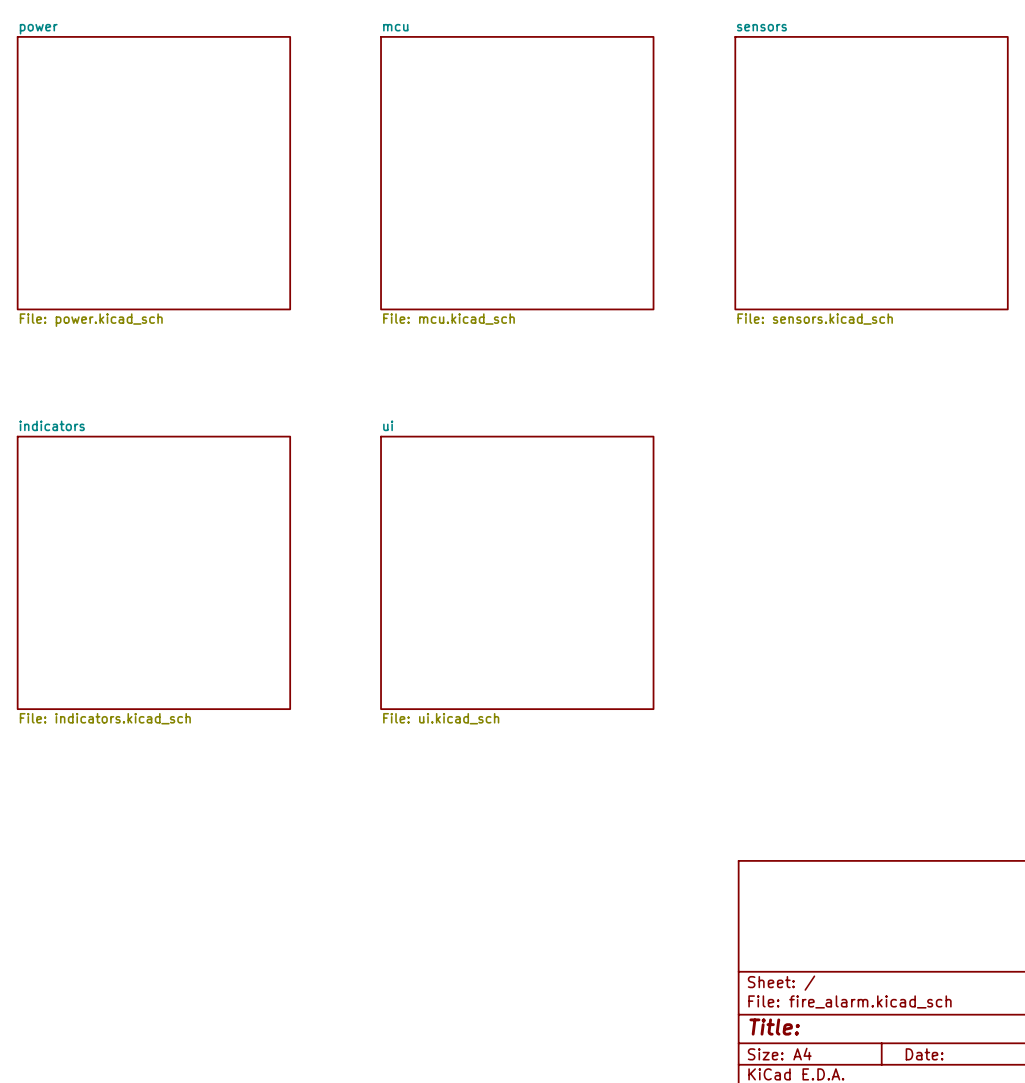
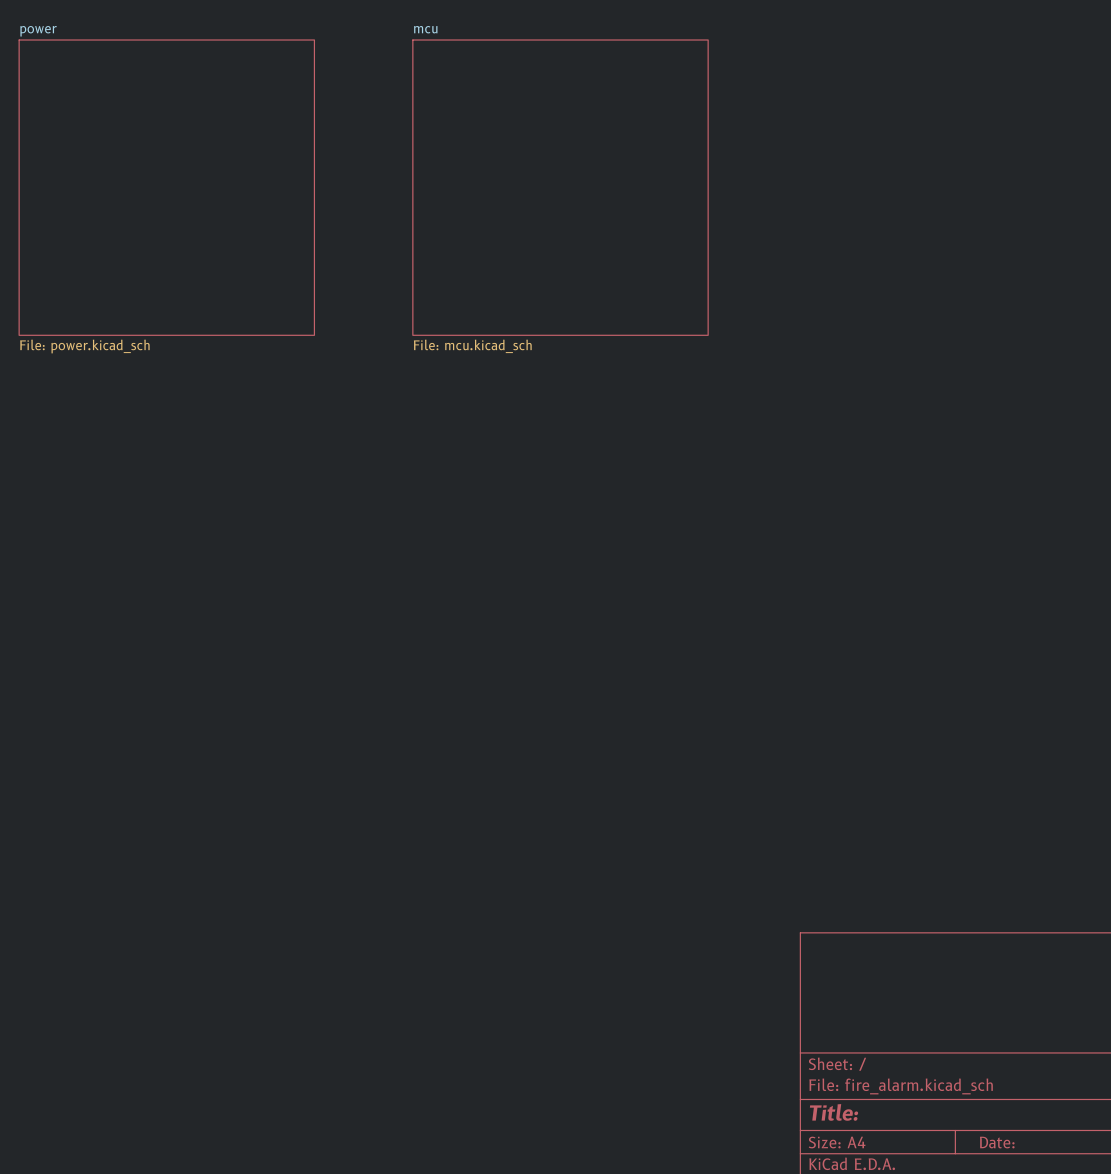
sheet sensors: File: sensors.kicad_sch (871, 173) -> none
sheet indicators: File: indicators.kicad_sch (153, 572) -> none
sheet ui: File: ui.kicad_sch (517, 572) -> none

